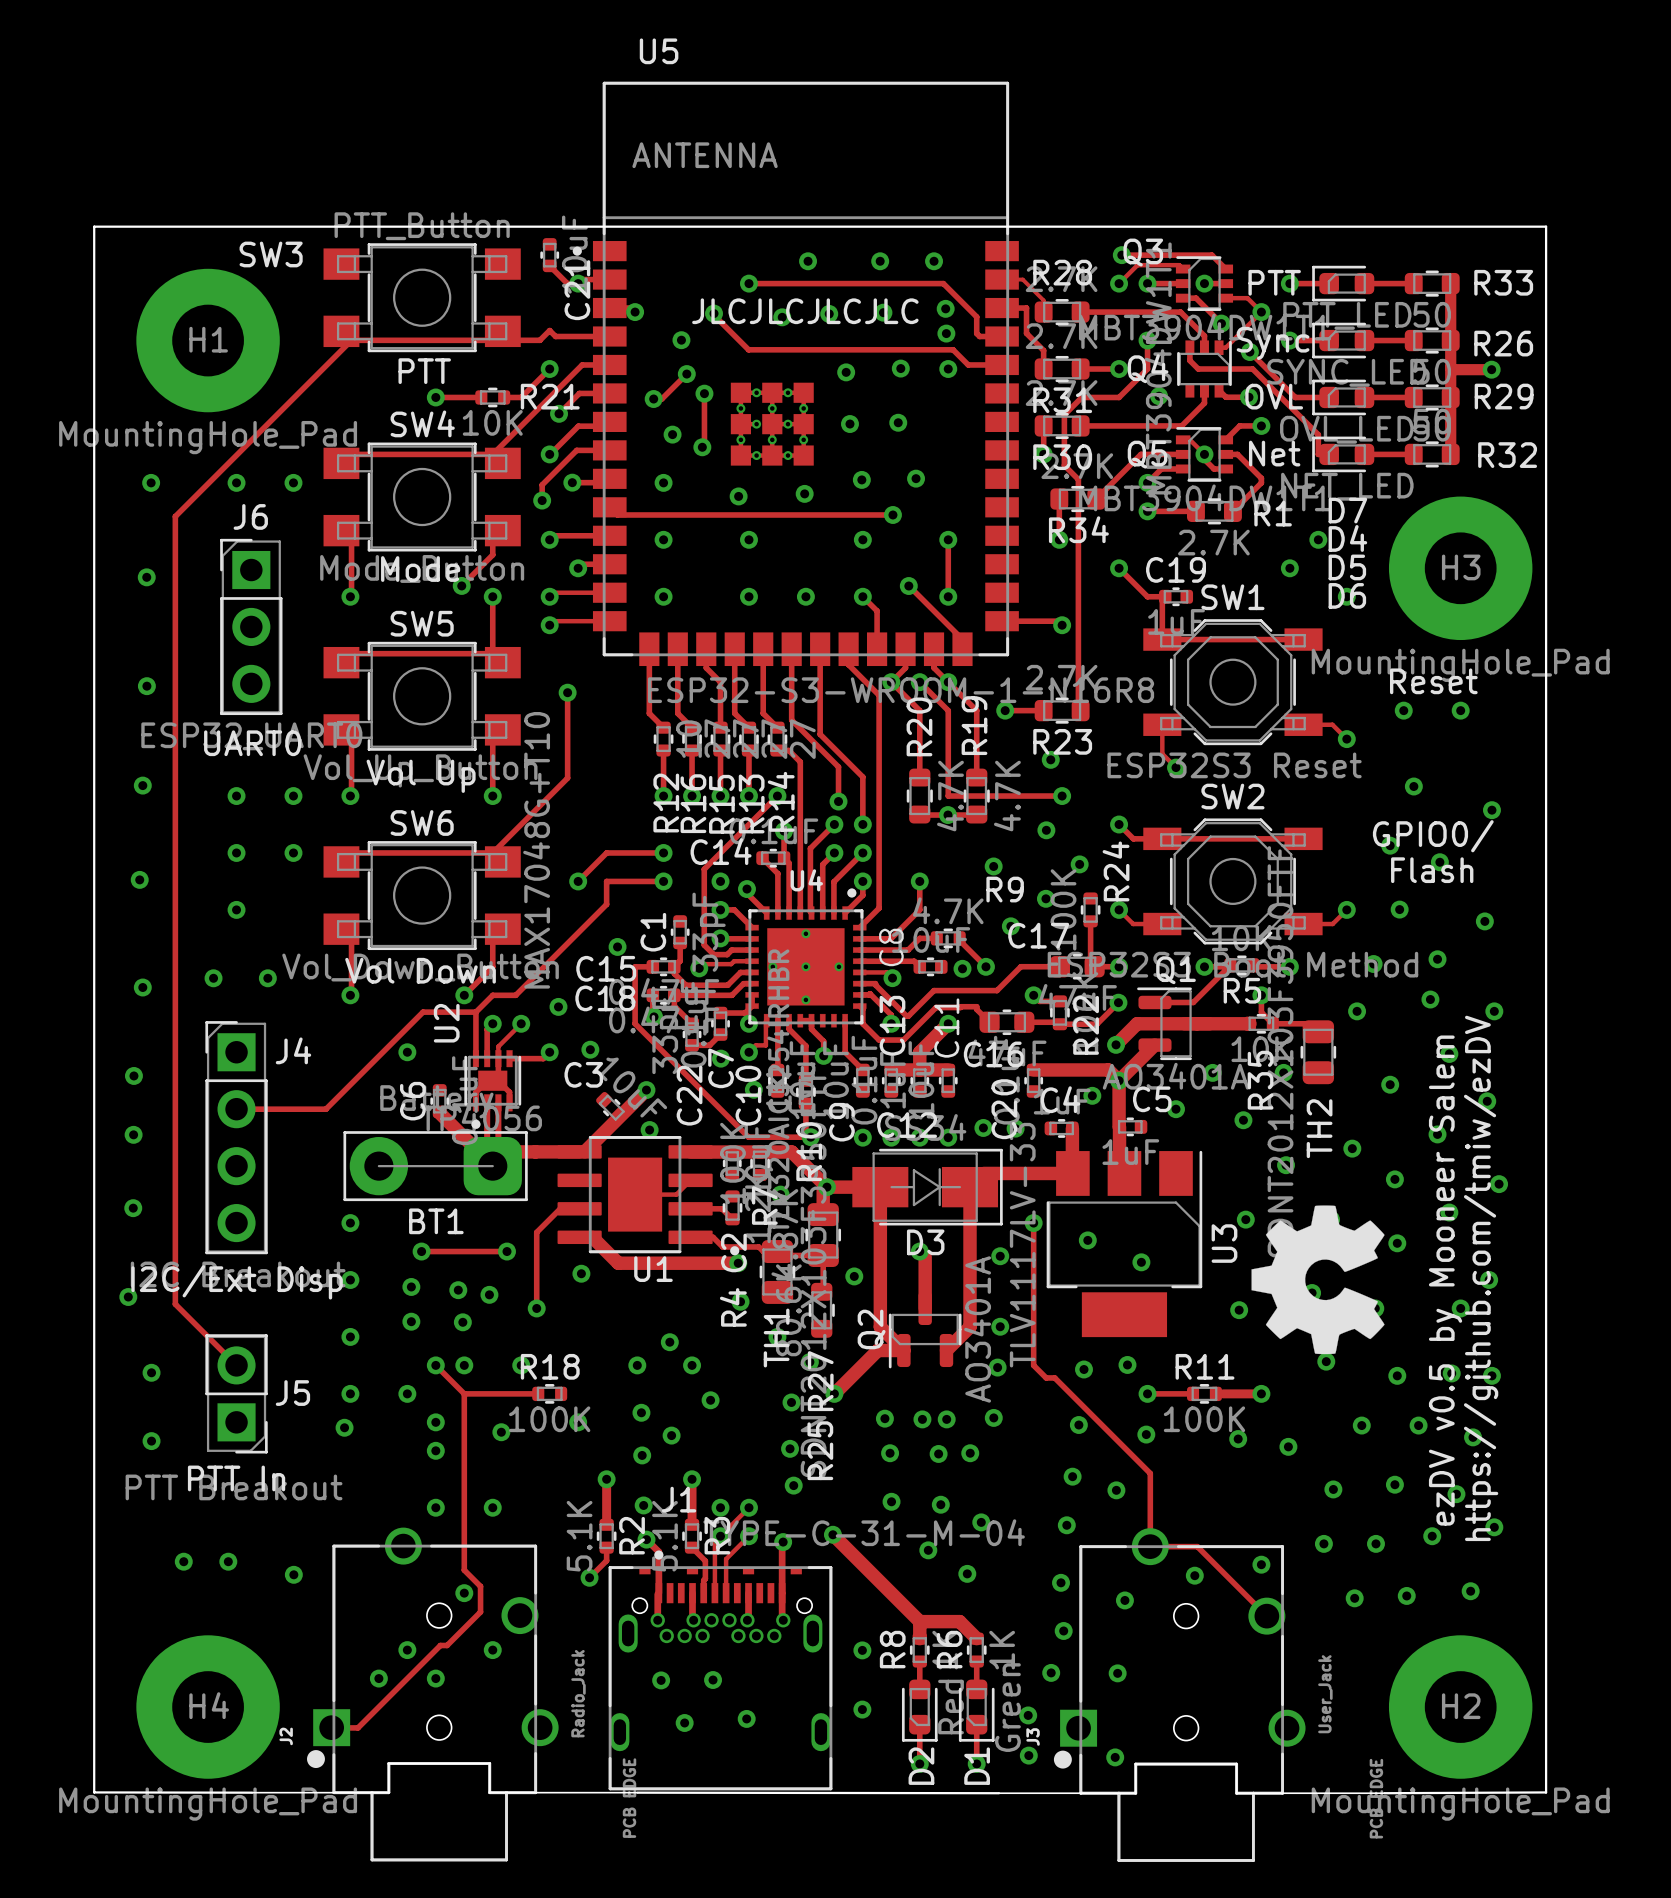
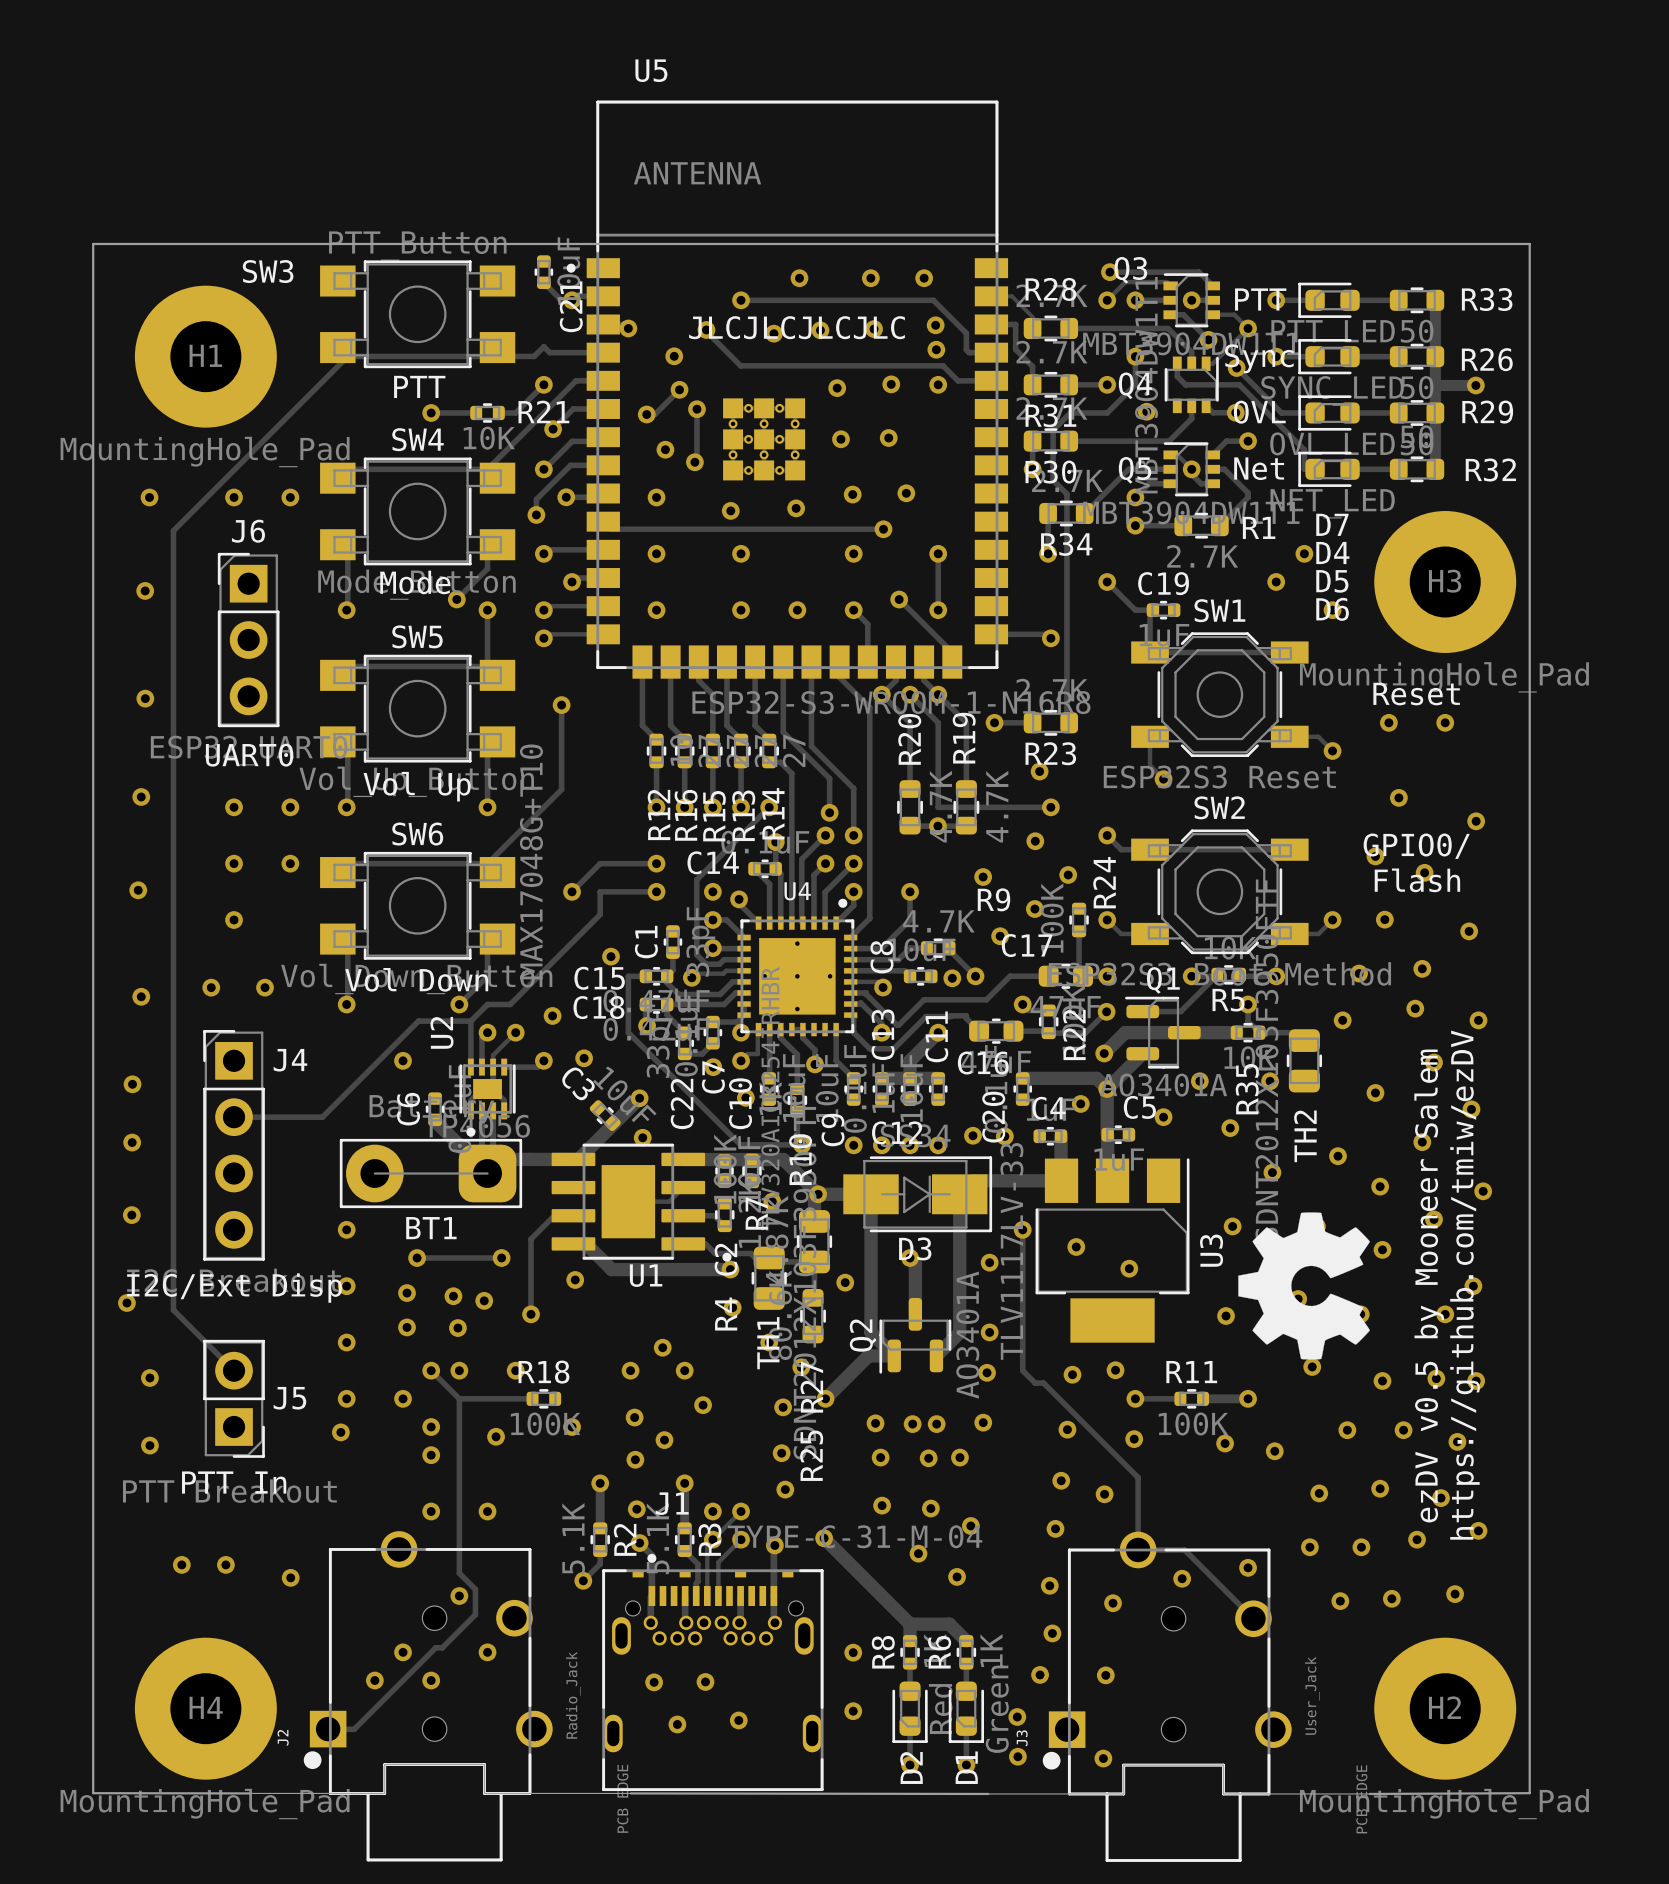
C3 name rotation: 0° (583, 1074) -> 45° clockwise (578, 1083)

